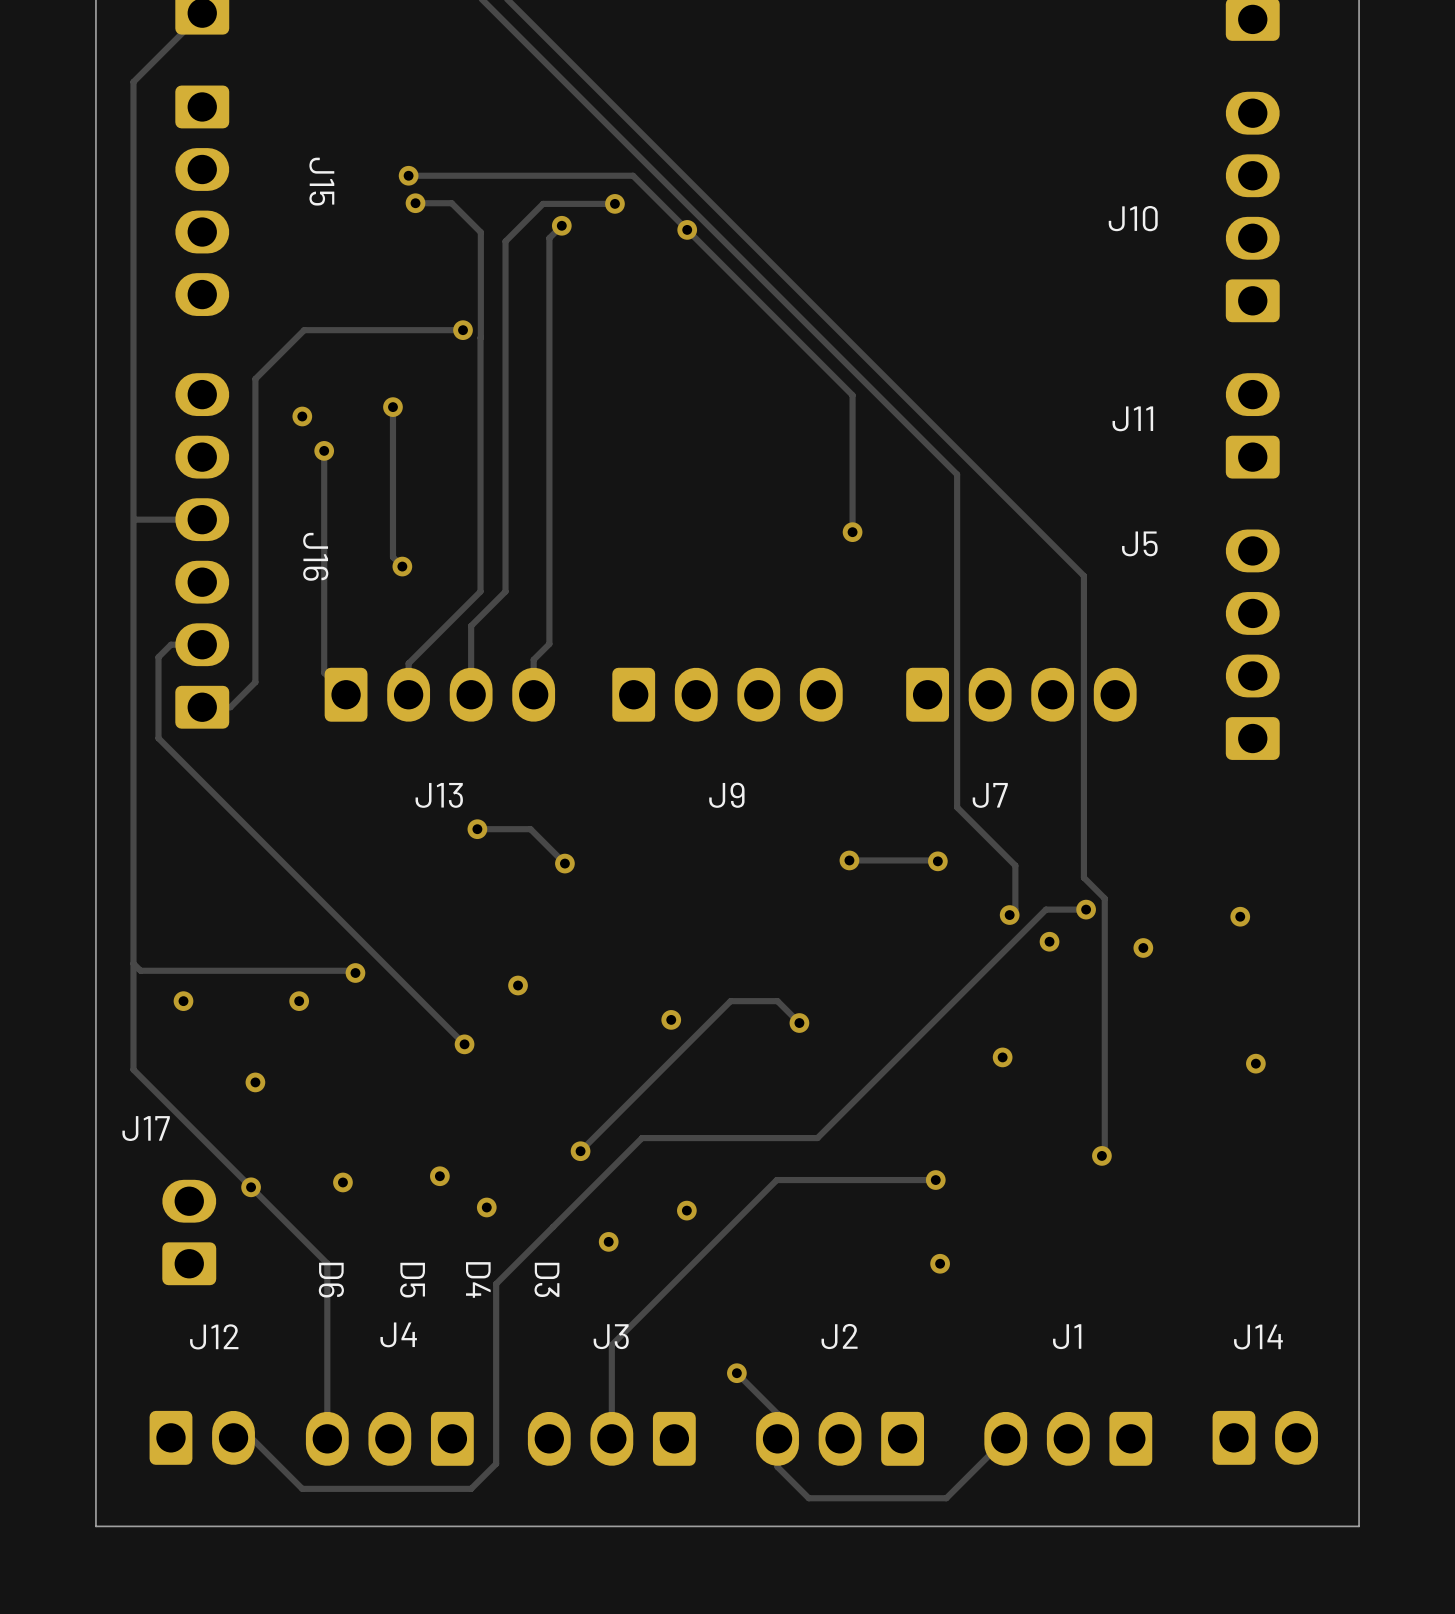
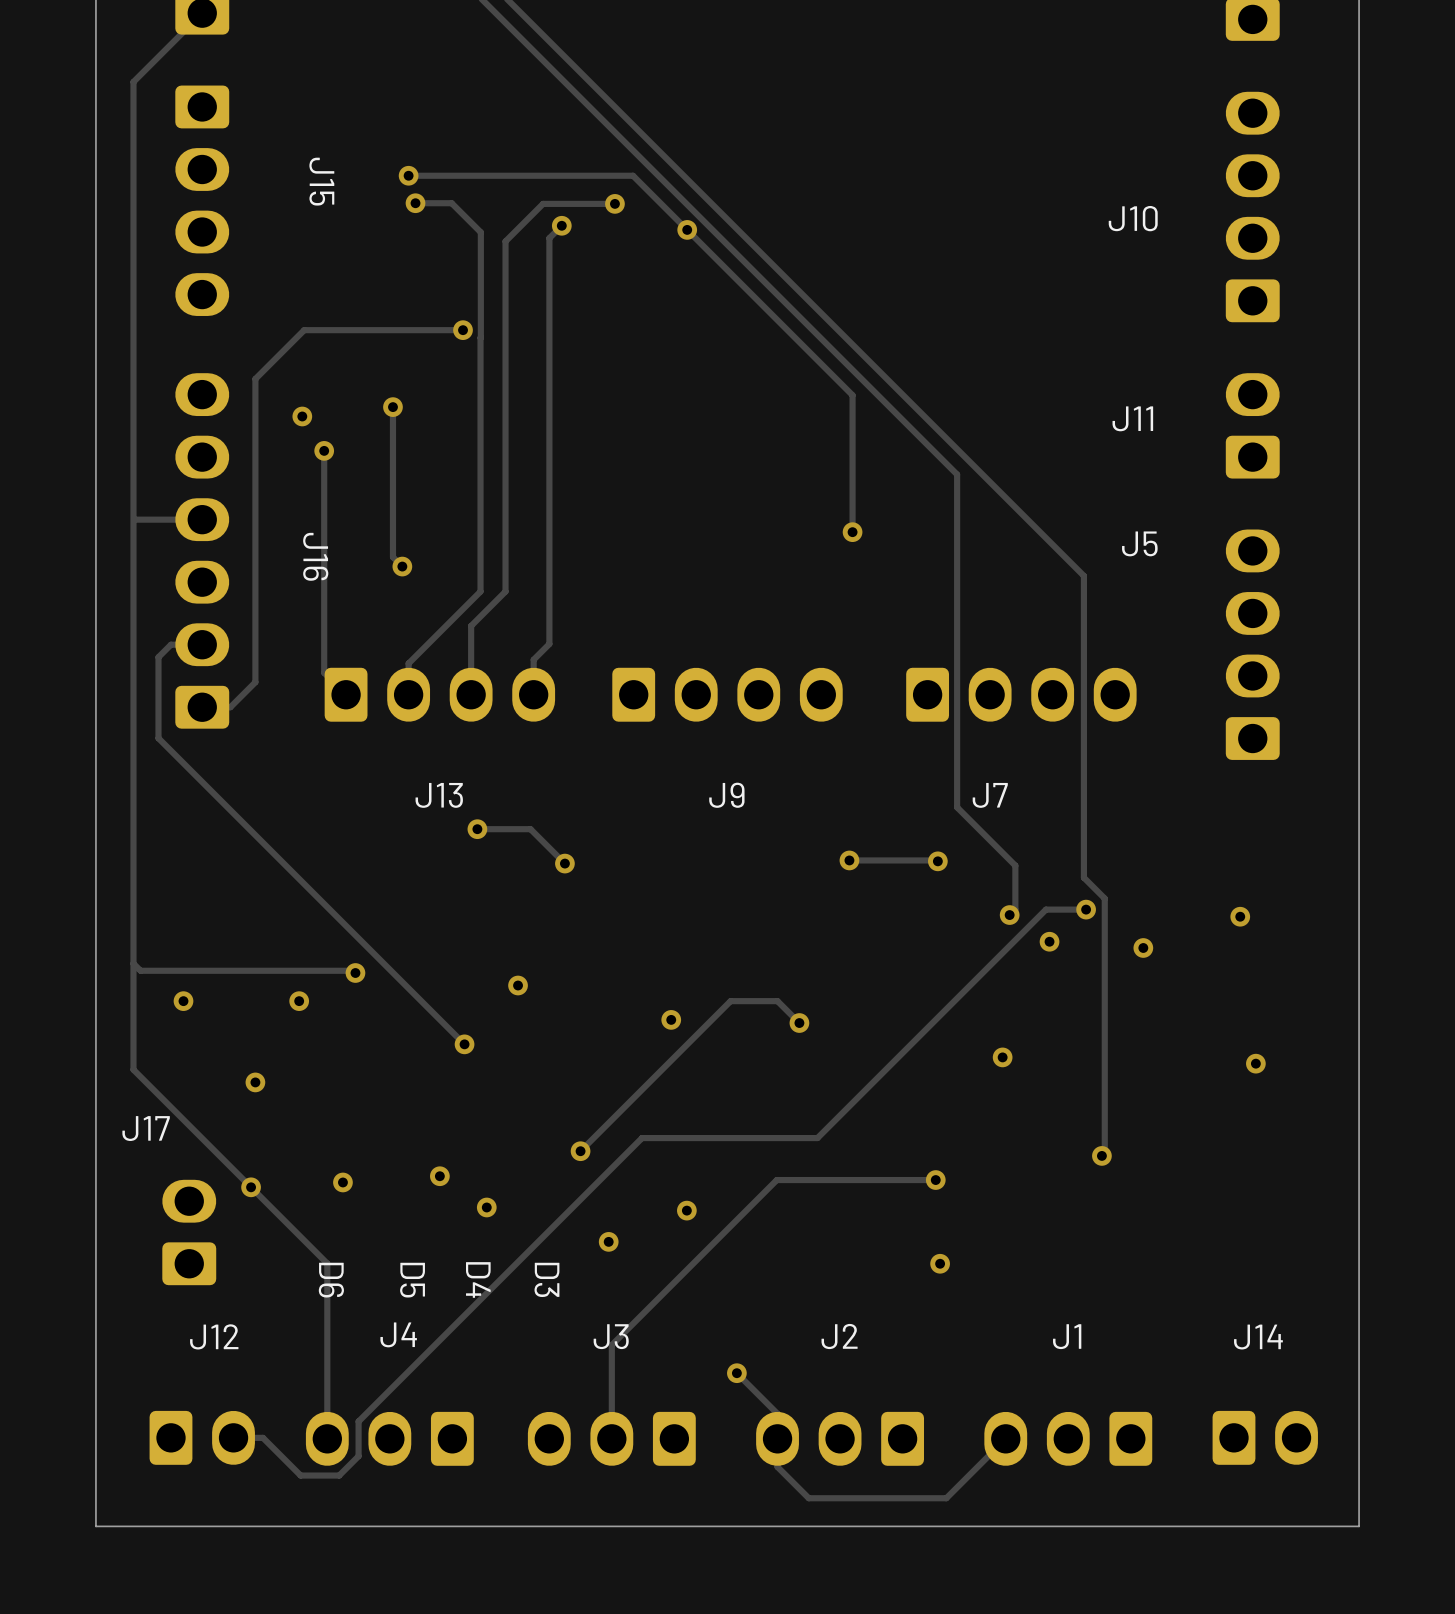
track: (496, 1283) (496, 1463) (471, 1488) (302, 1488) (251, 1437) -> (496, 1283) (358, 1421) (358, 1456) (339, 1475) (300, 1475) (262, 1437) (251, 1437)

